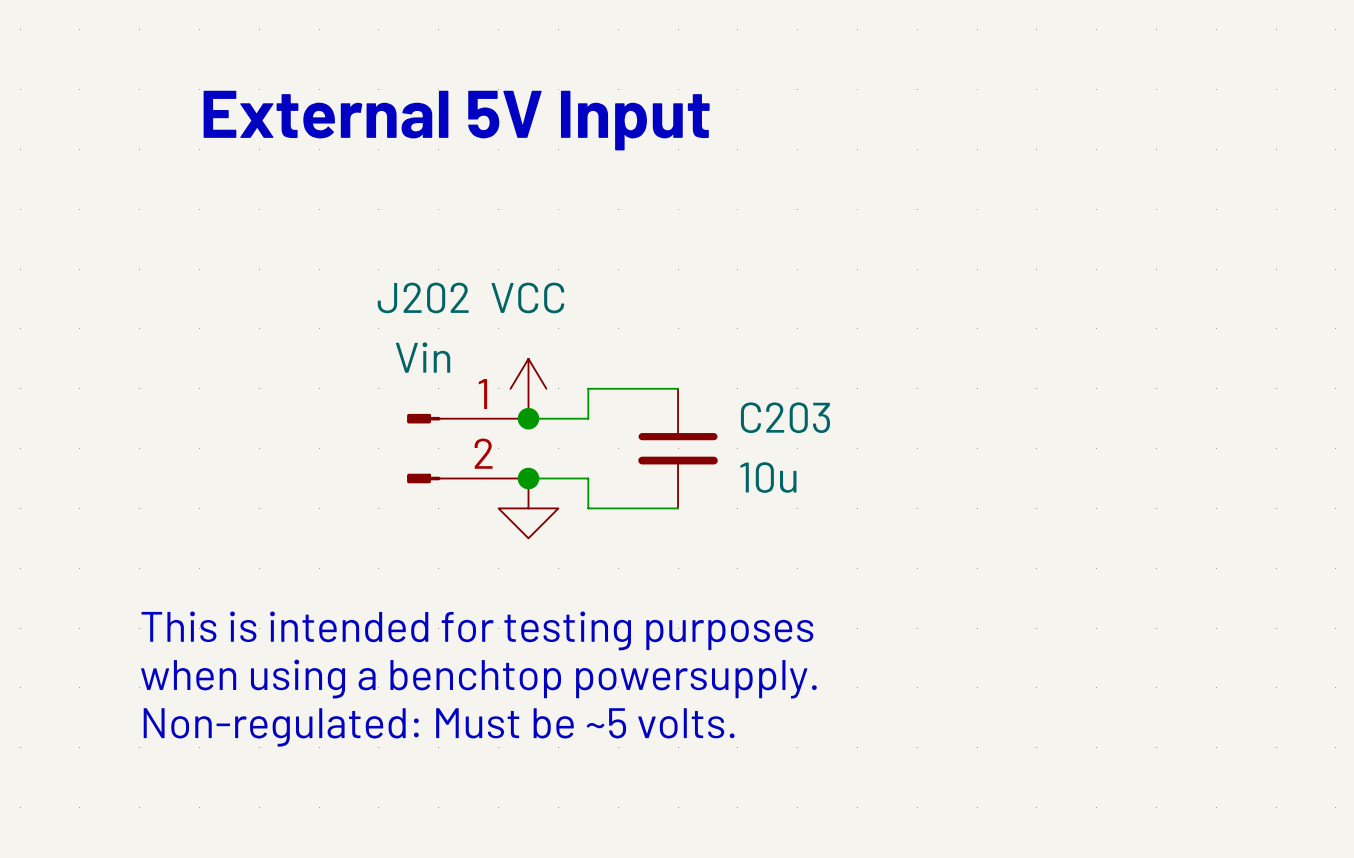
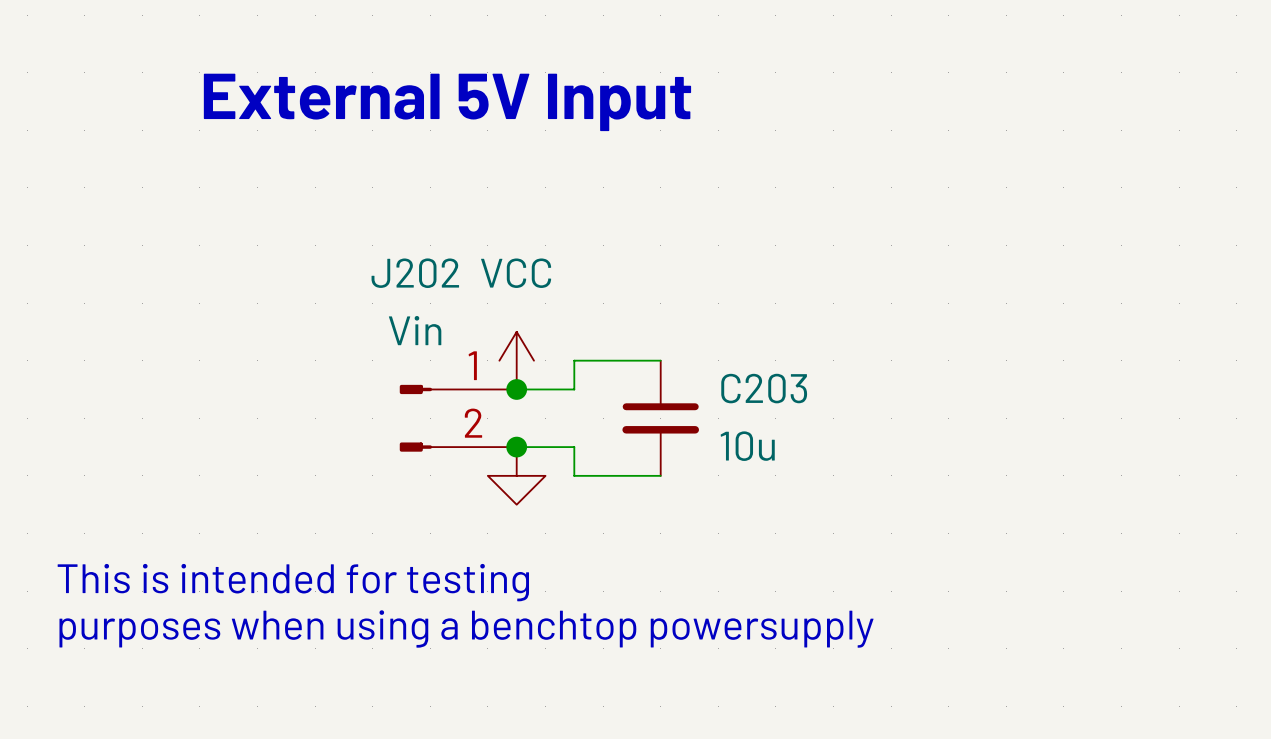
text: This is intended for testing purposes (477, 630) -> This is intended for testing (293, 582)
text: when using a benchtop powersupply. (478, 679) -> purposes when using a benchtop powersupply (466, 628)
text: Non-regulated: Must be ~5 volts. (439, 727) -> none

